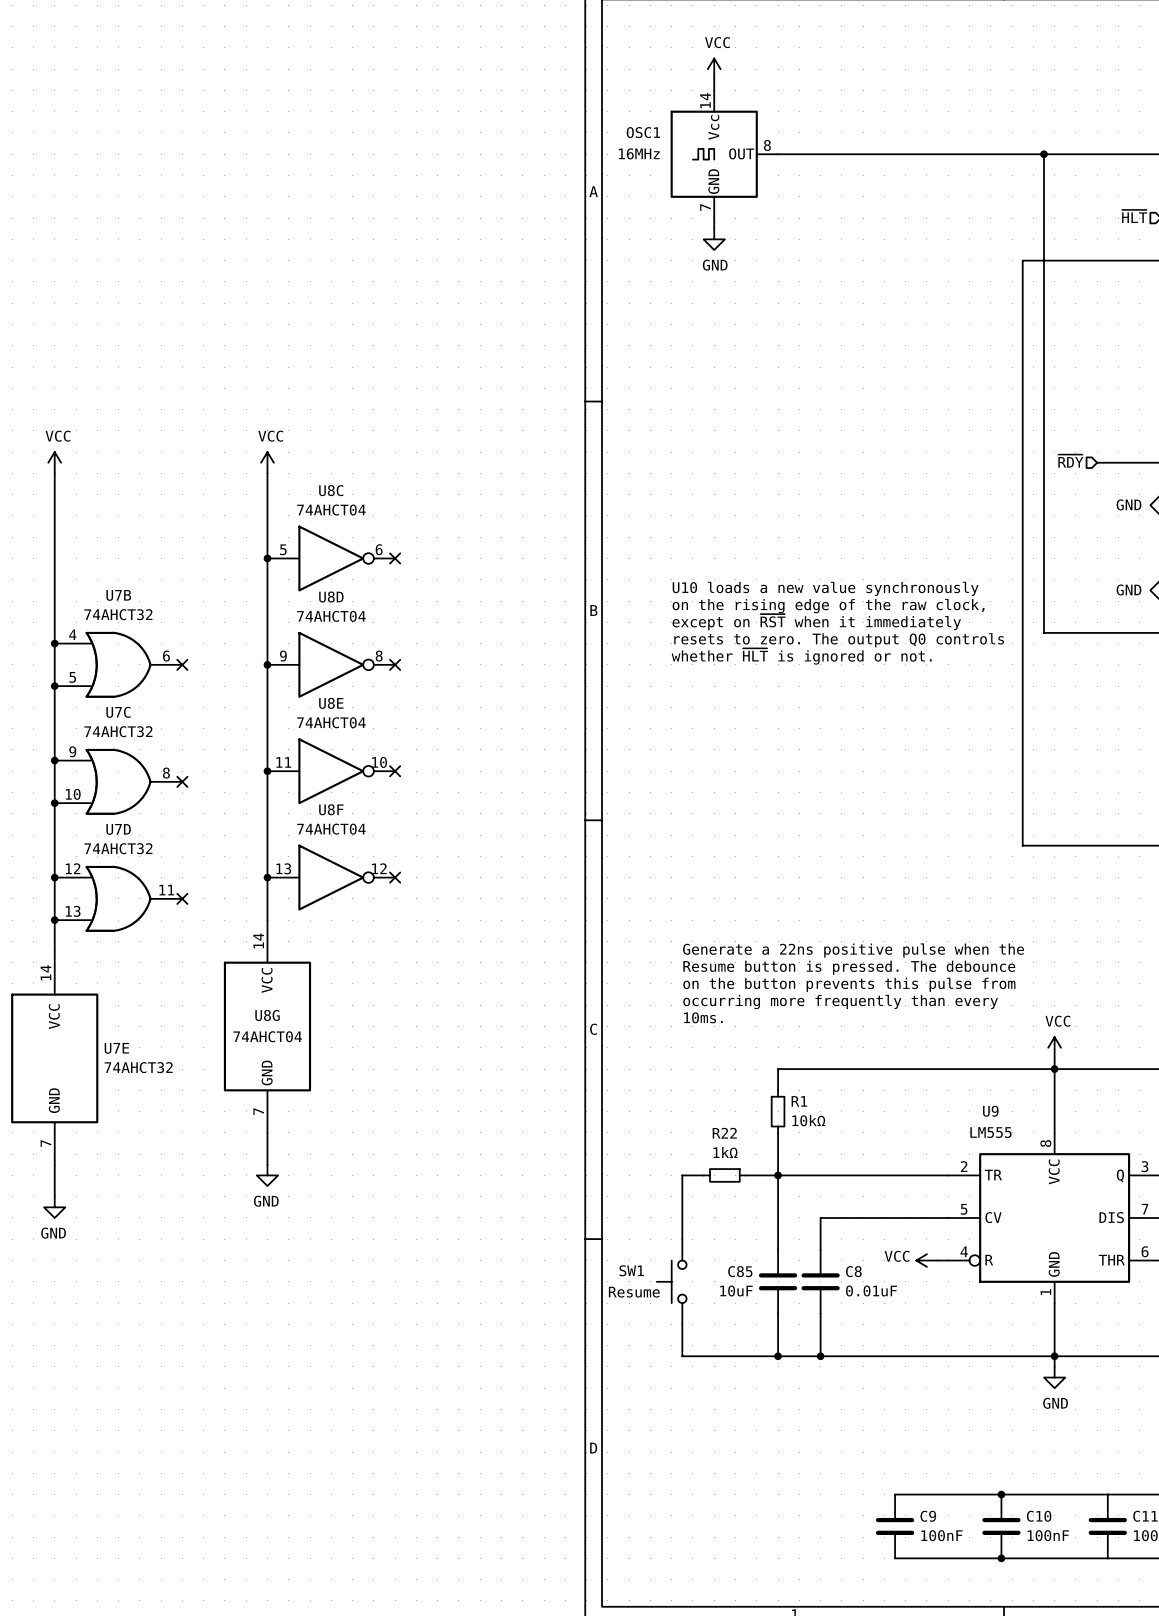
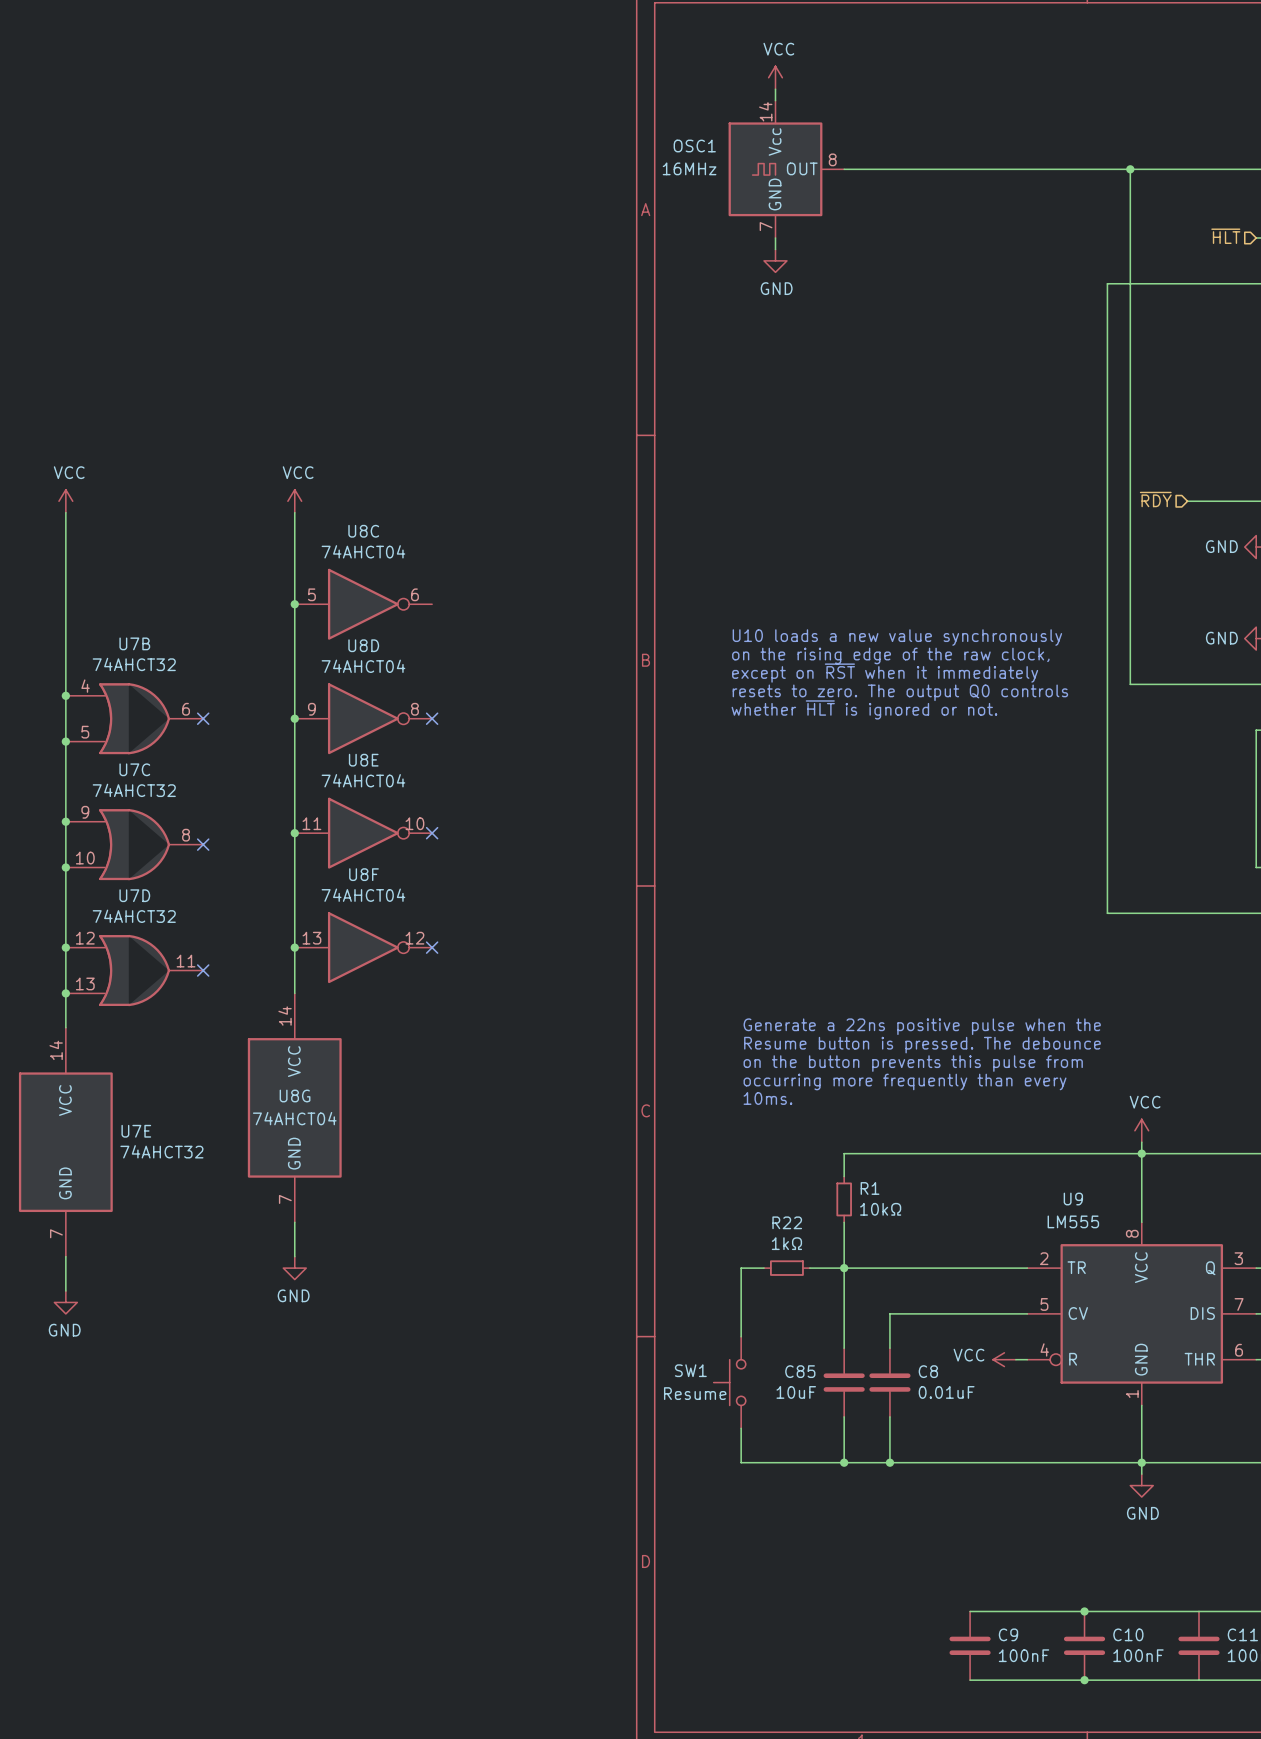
no-connect mark: (395, 558) -> none

